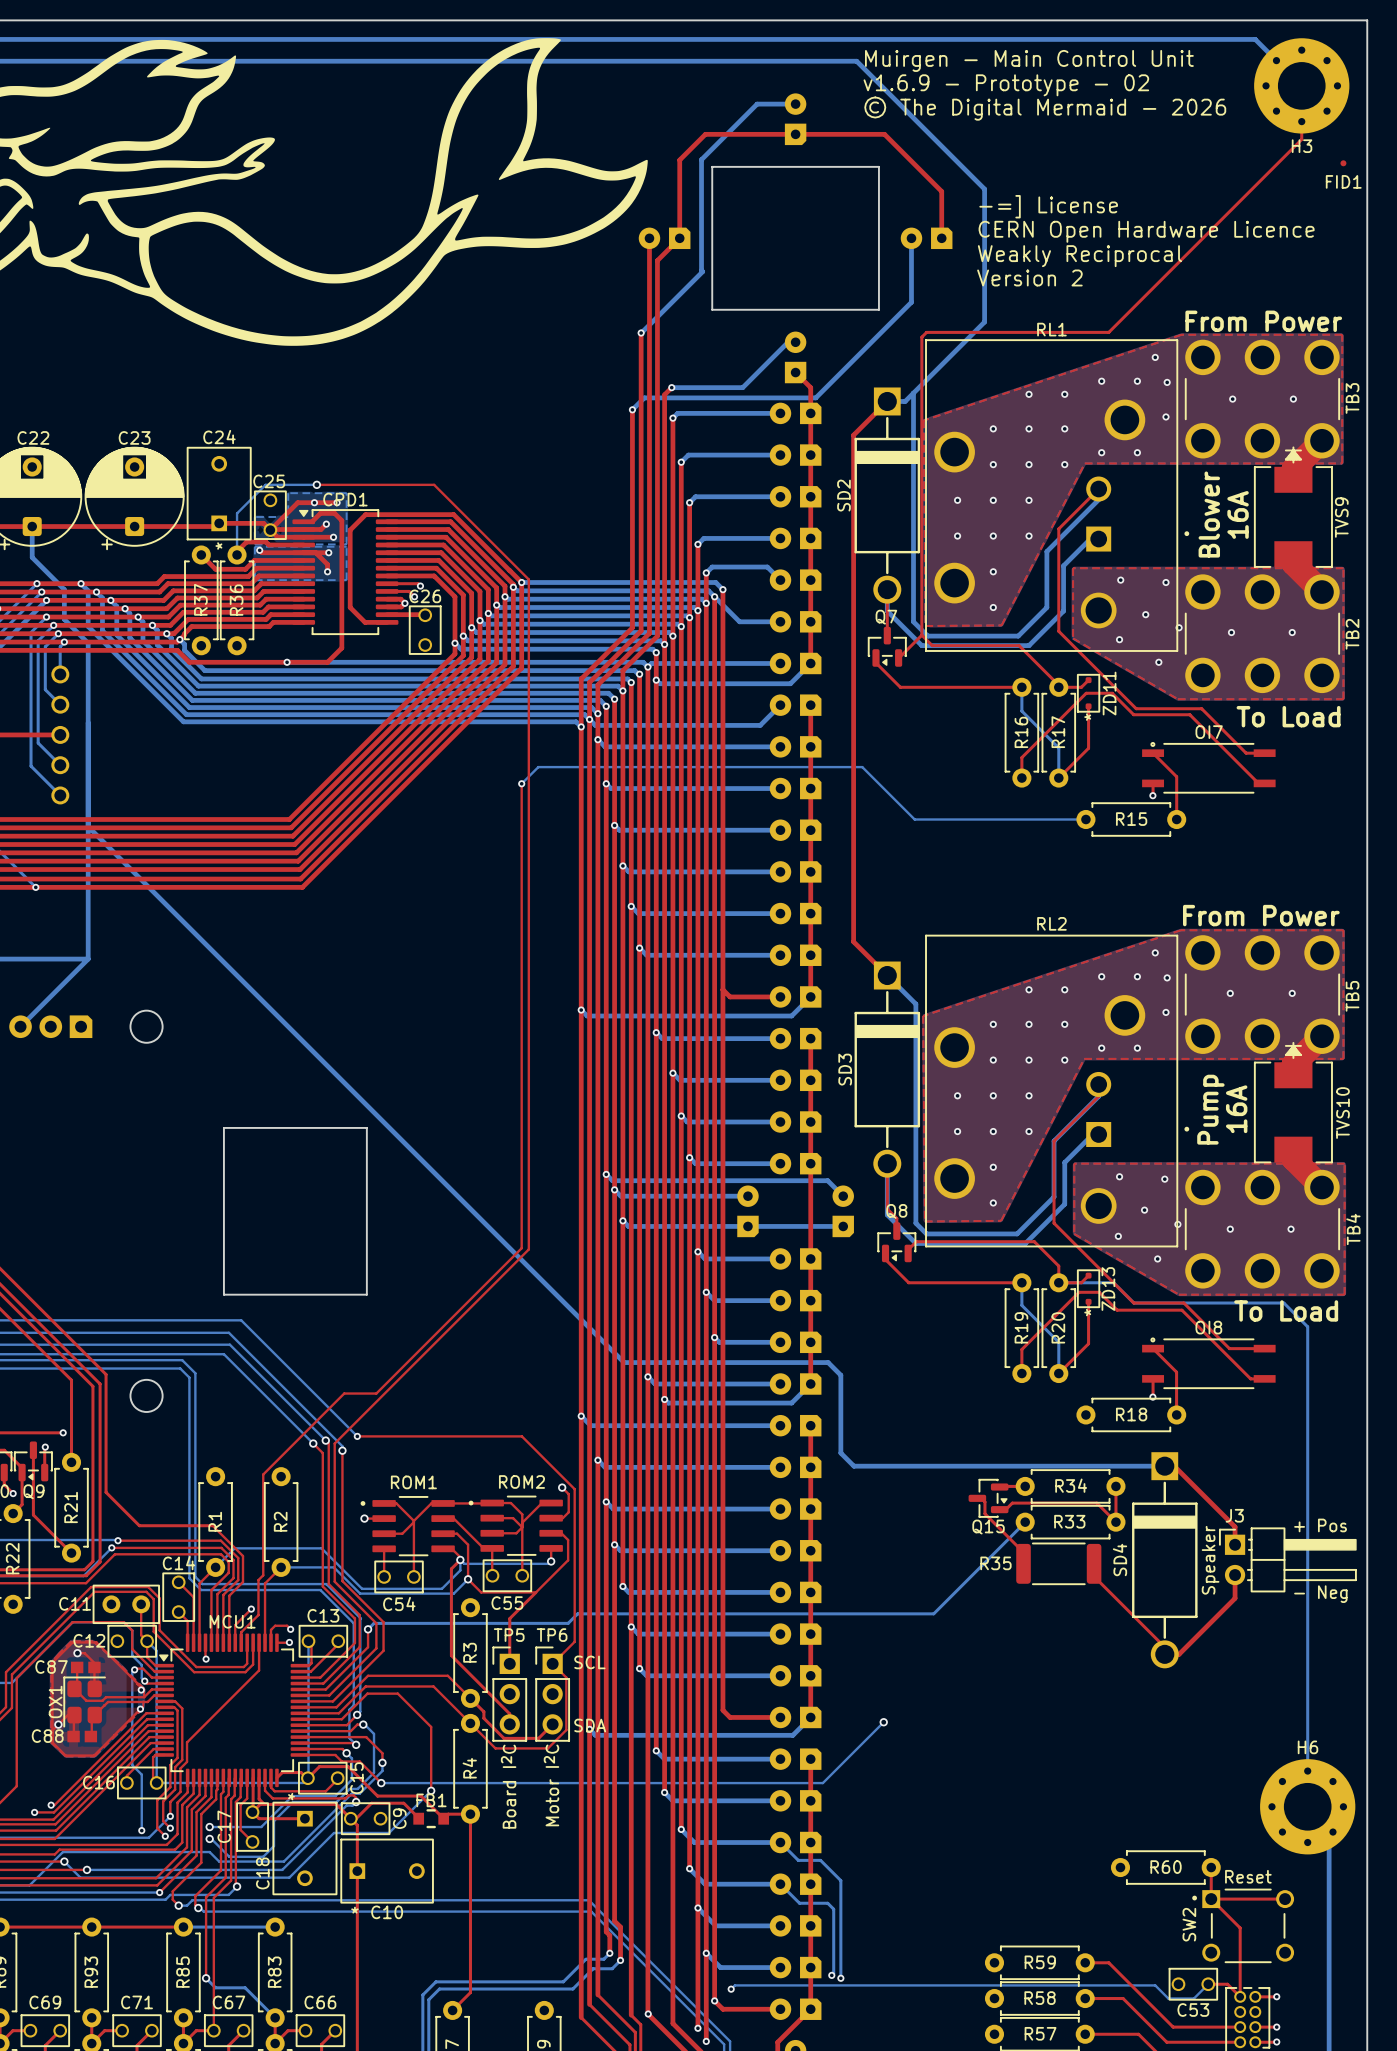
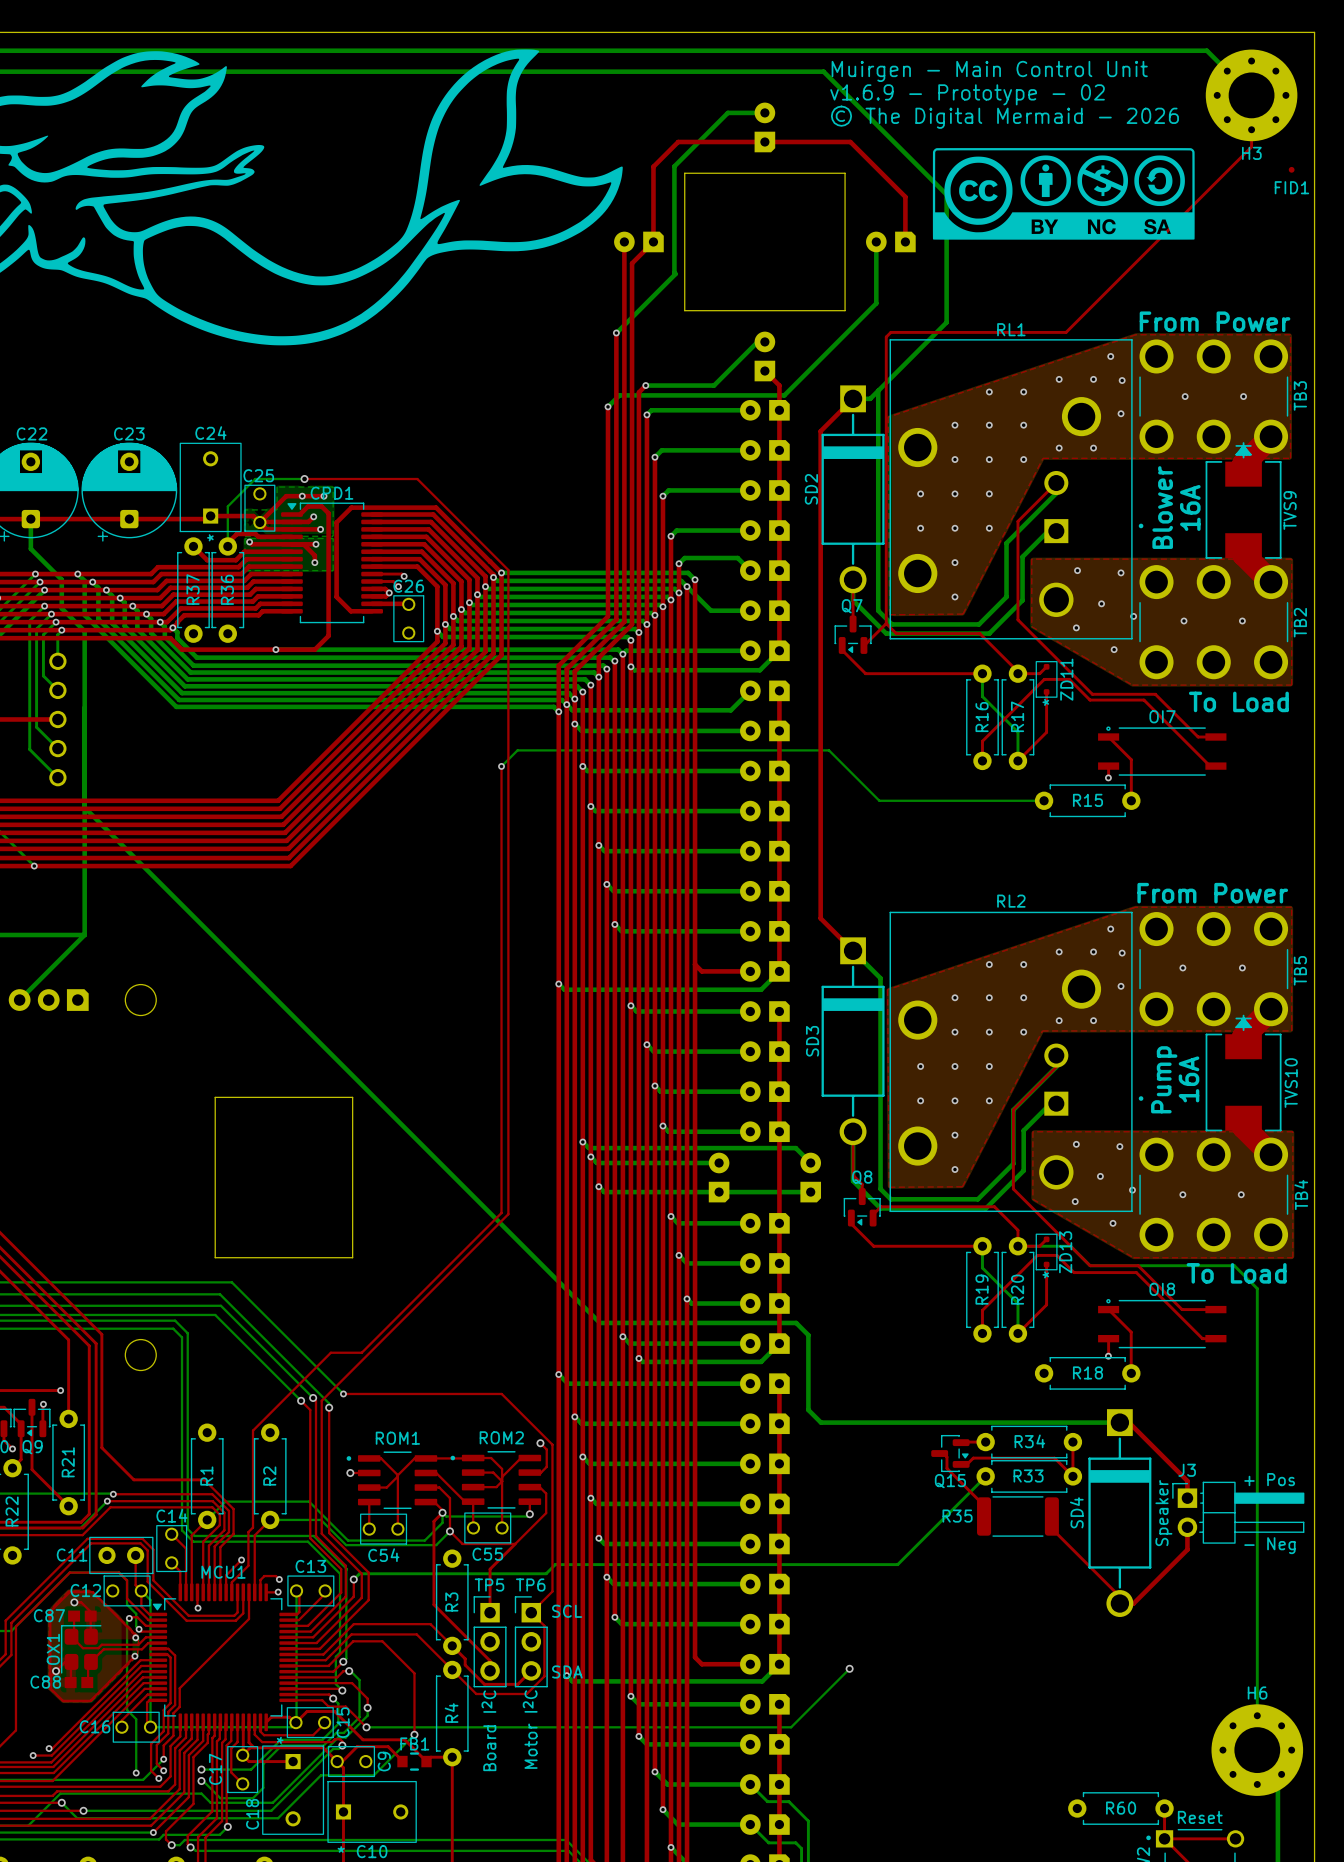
drawing: none -> [932, 148, 1195, 240]
text: -=] License (1048, 206) -> none
text: CERN Open Hardware Licence (1146, 231) -> none
text: Weakly Reciprocal (1079, 256) -> none
text: Version 2 (1029, 277) -> none

